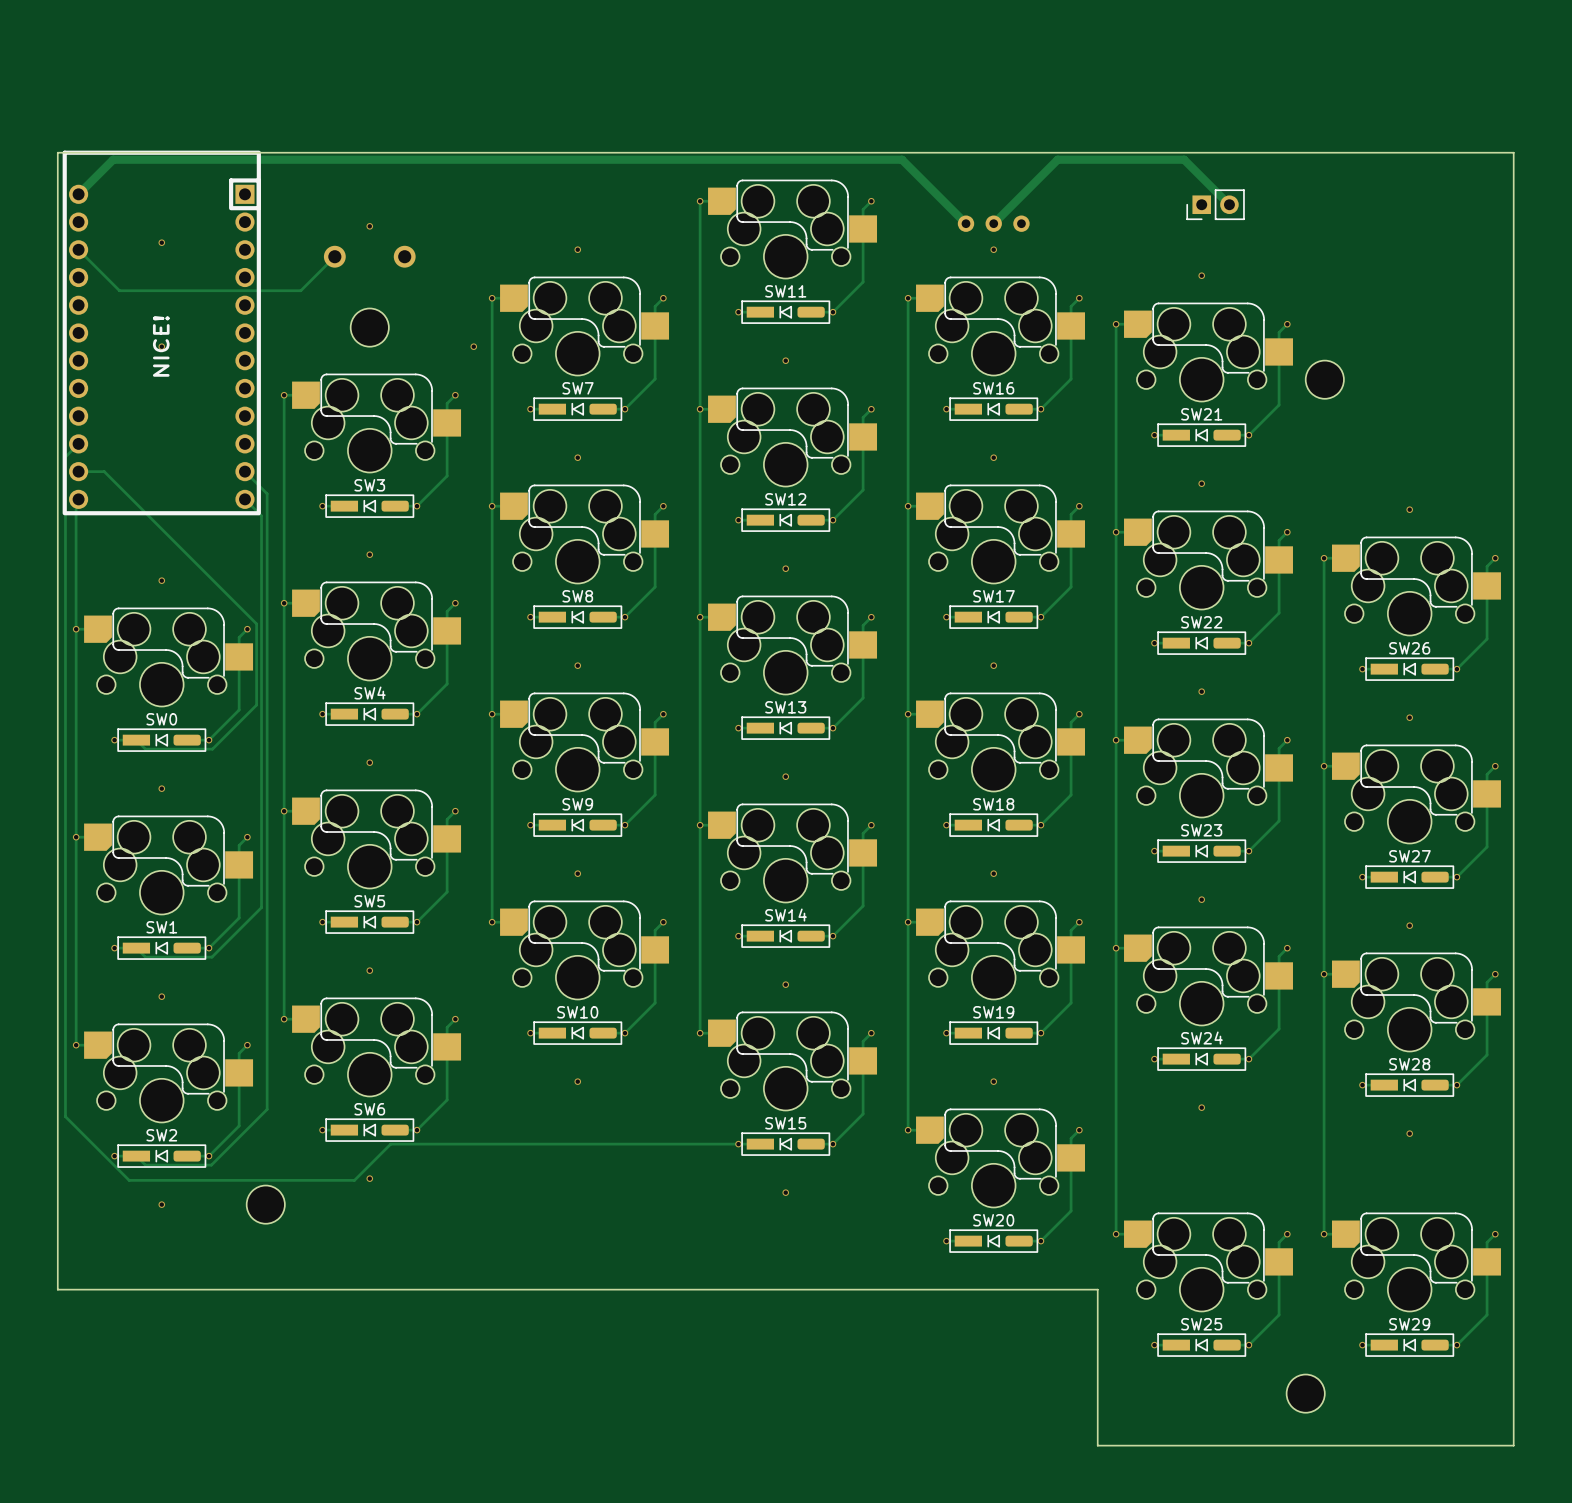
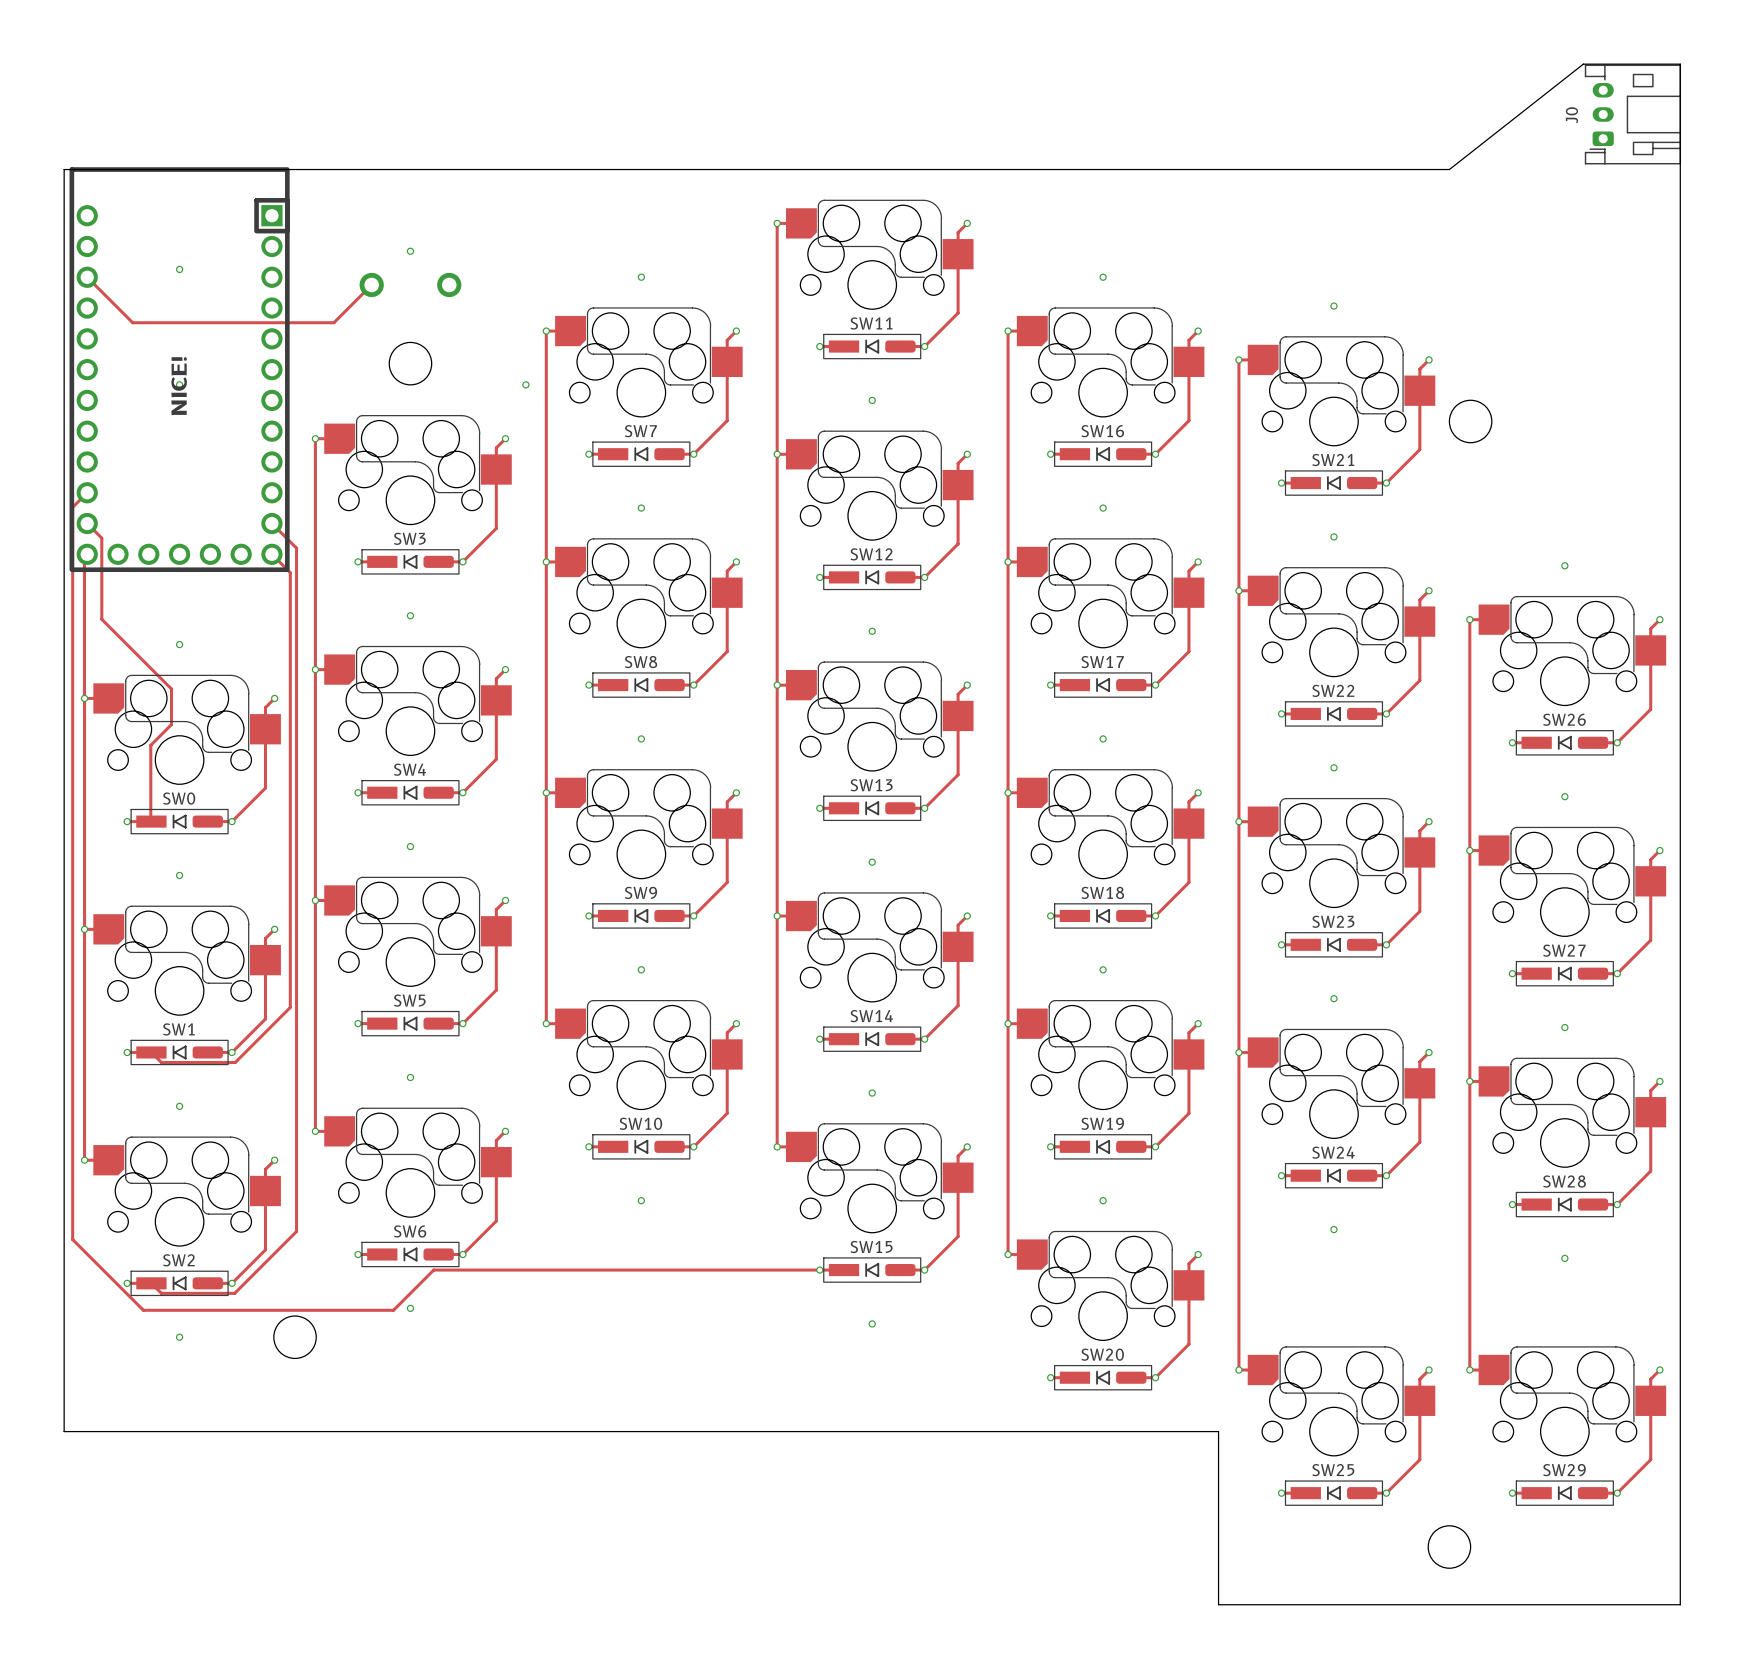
J0: none -> (1632, 114)
part footprint: [62, 150, 261, 516] -> [69, 167, 290, 573]
board edge: (1305, 152) (1513, 152) -> (1449, 169) (1583, 64) (1680, 64) (1680, 169)
track: (78, 194) (113, 159) (902, 159) (966, 223) -> none
part: (1215, 204) -> none
track: (1229, 204) (1184, 159) (1057, 159) (993, 223) -> none
part: (993, 223) -> none
track: (78, 471) (104, 471) (256, 623) (256, 705) (212, 749) (145, 749) (136, 740) -> (87, 523) (101, 538) (101, 619) (171, 689) (171, 724) (150, 745) (151, 821)

